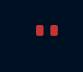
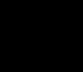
part: (46, 30) -> none

